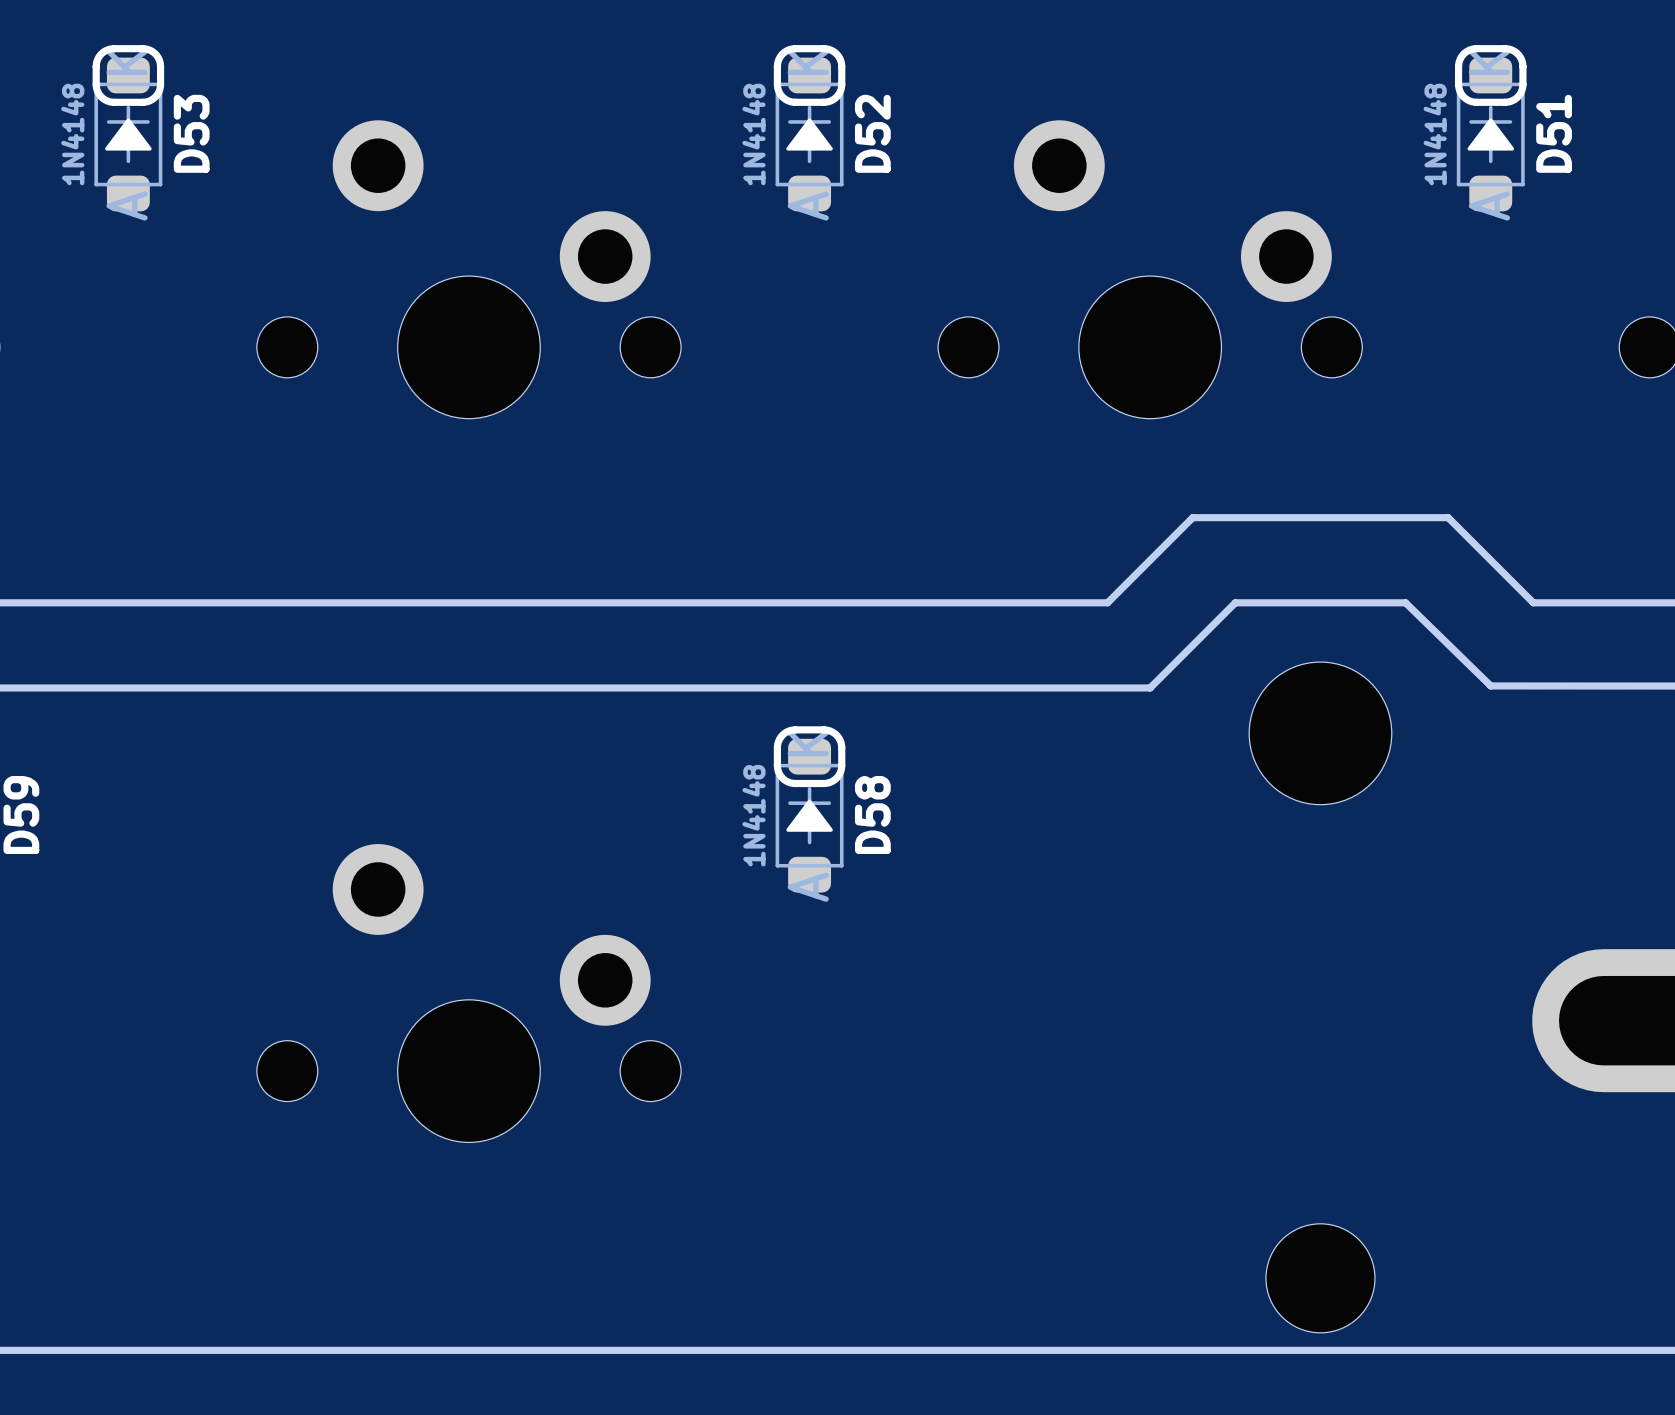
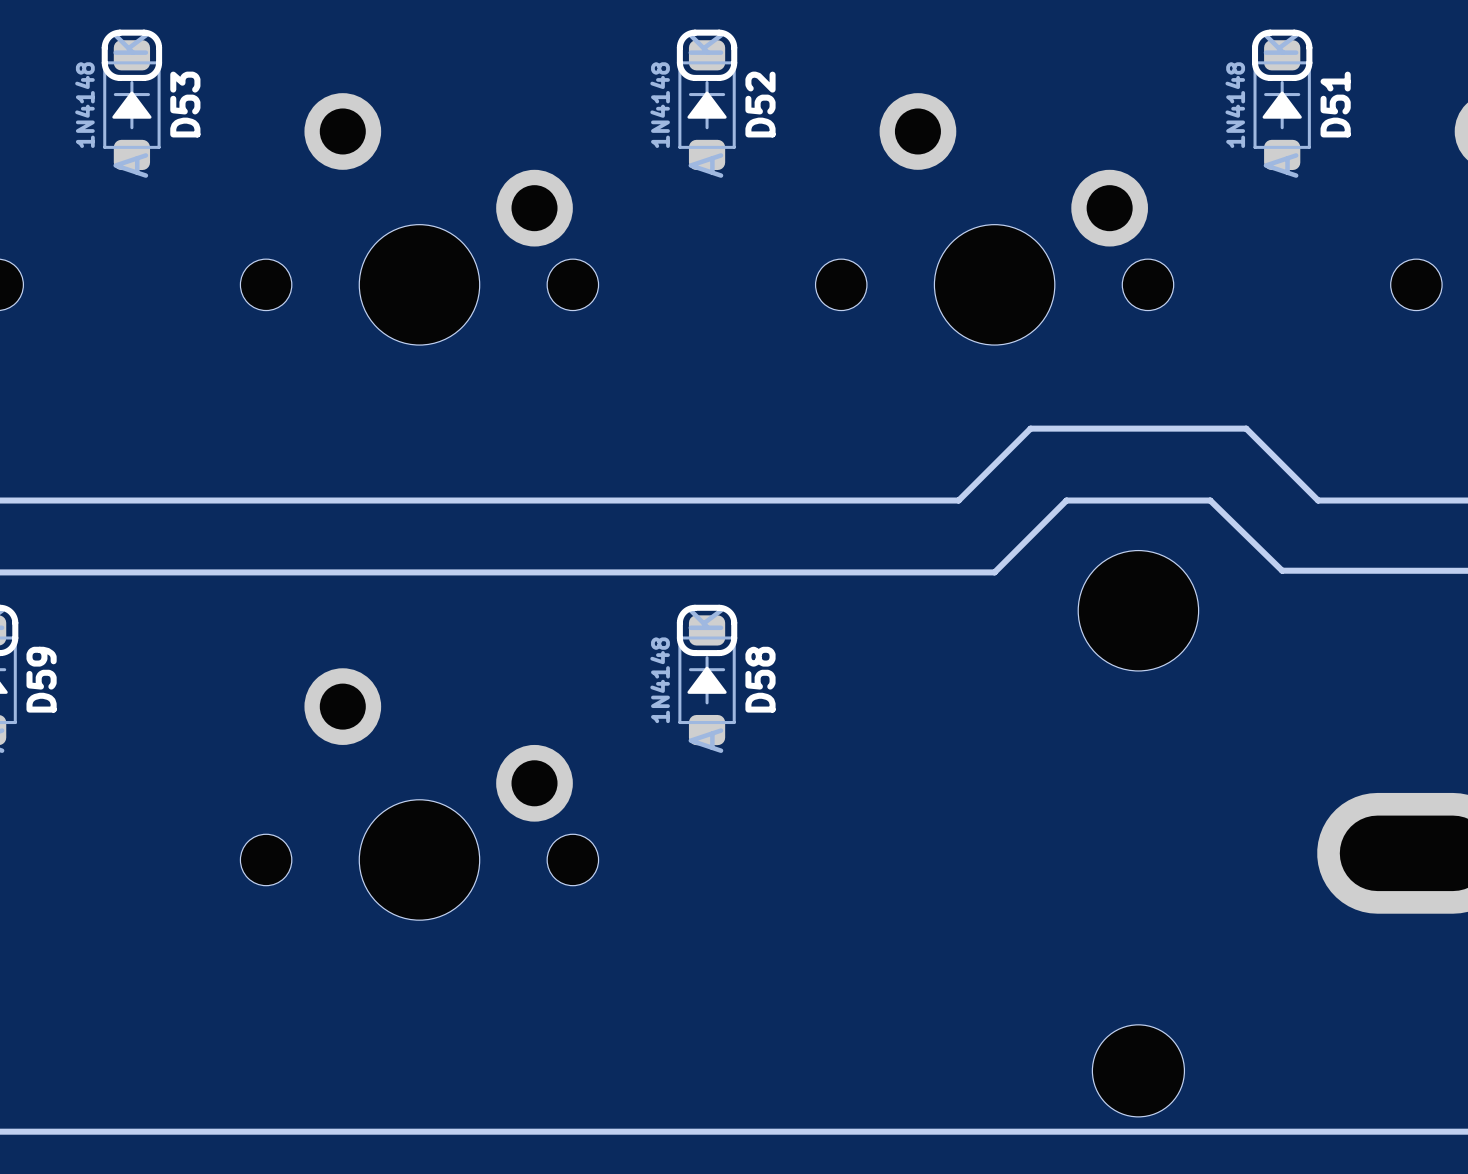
part position: (468, 993) -> (419, 794)

